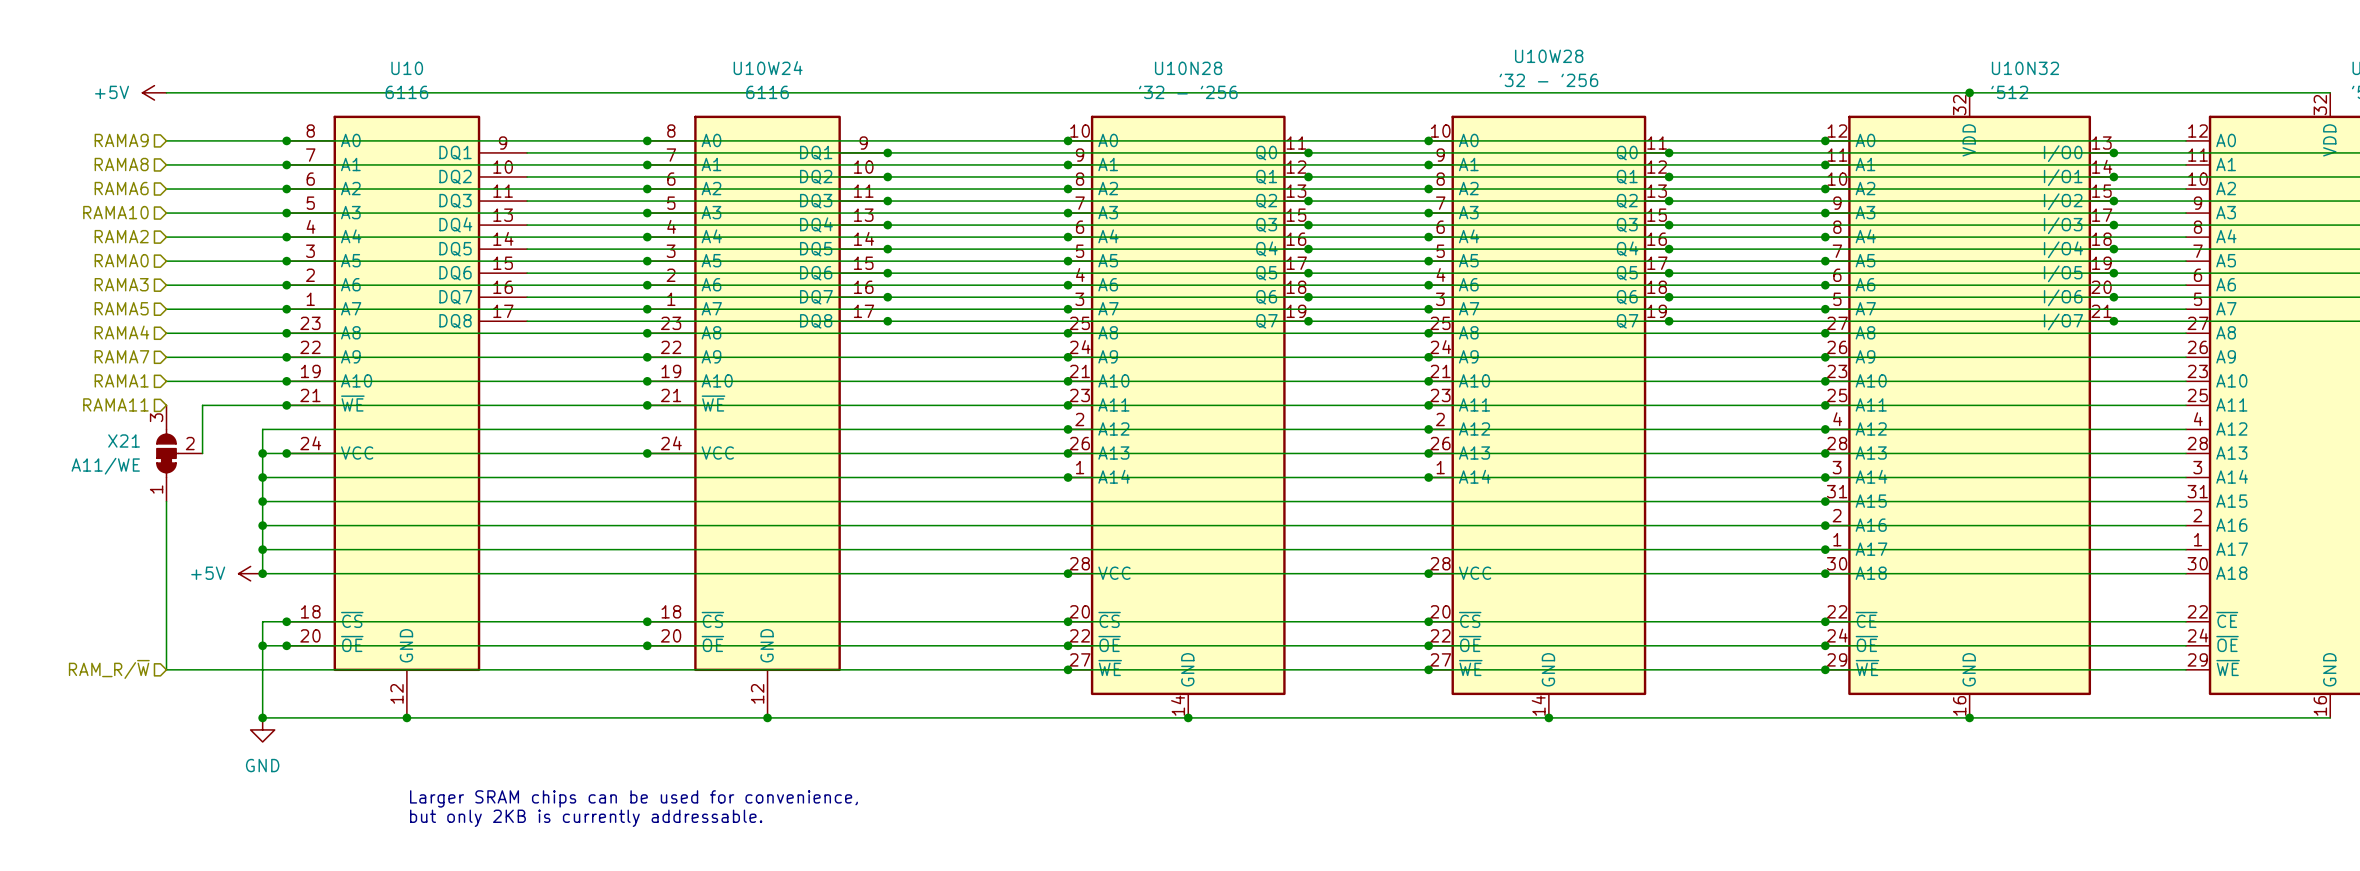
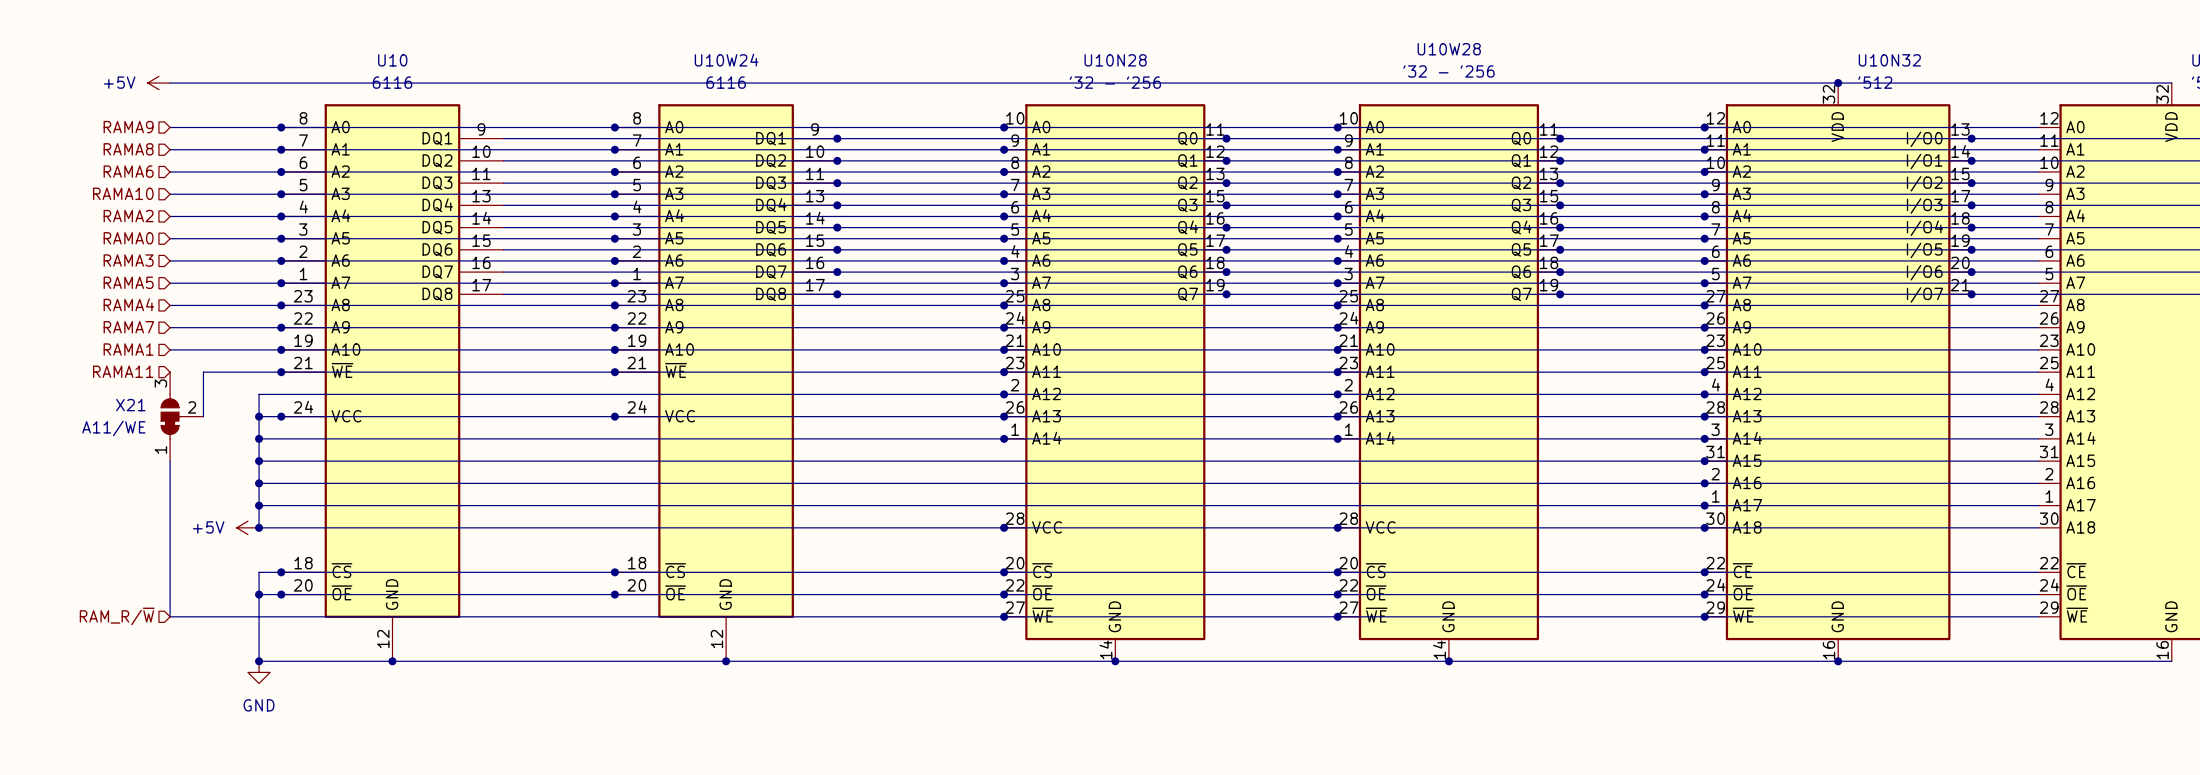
text: Larger SRAM chips can be used for convenience, (633, 798) -> none
text: but only 2KB is currently addressable. (586, 818) -> none

